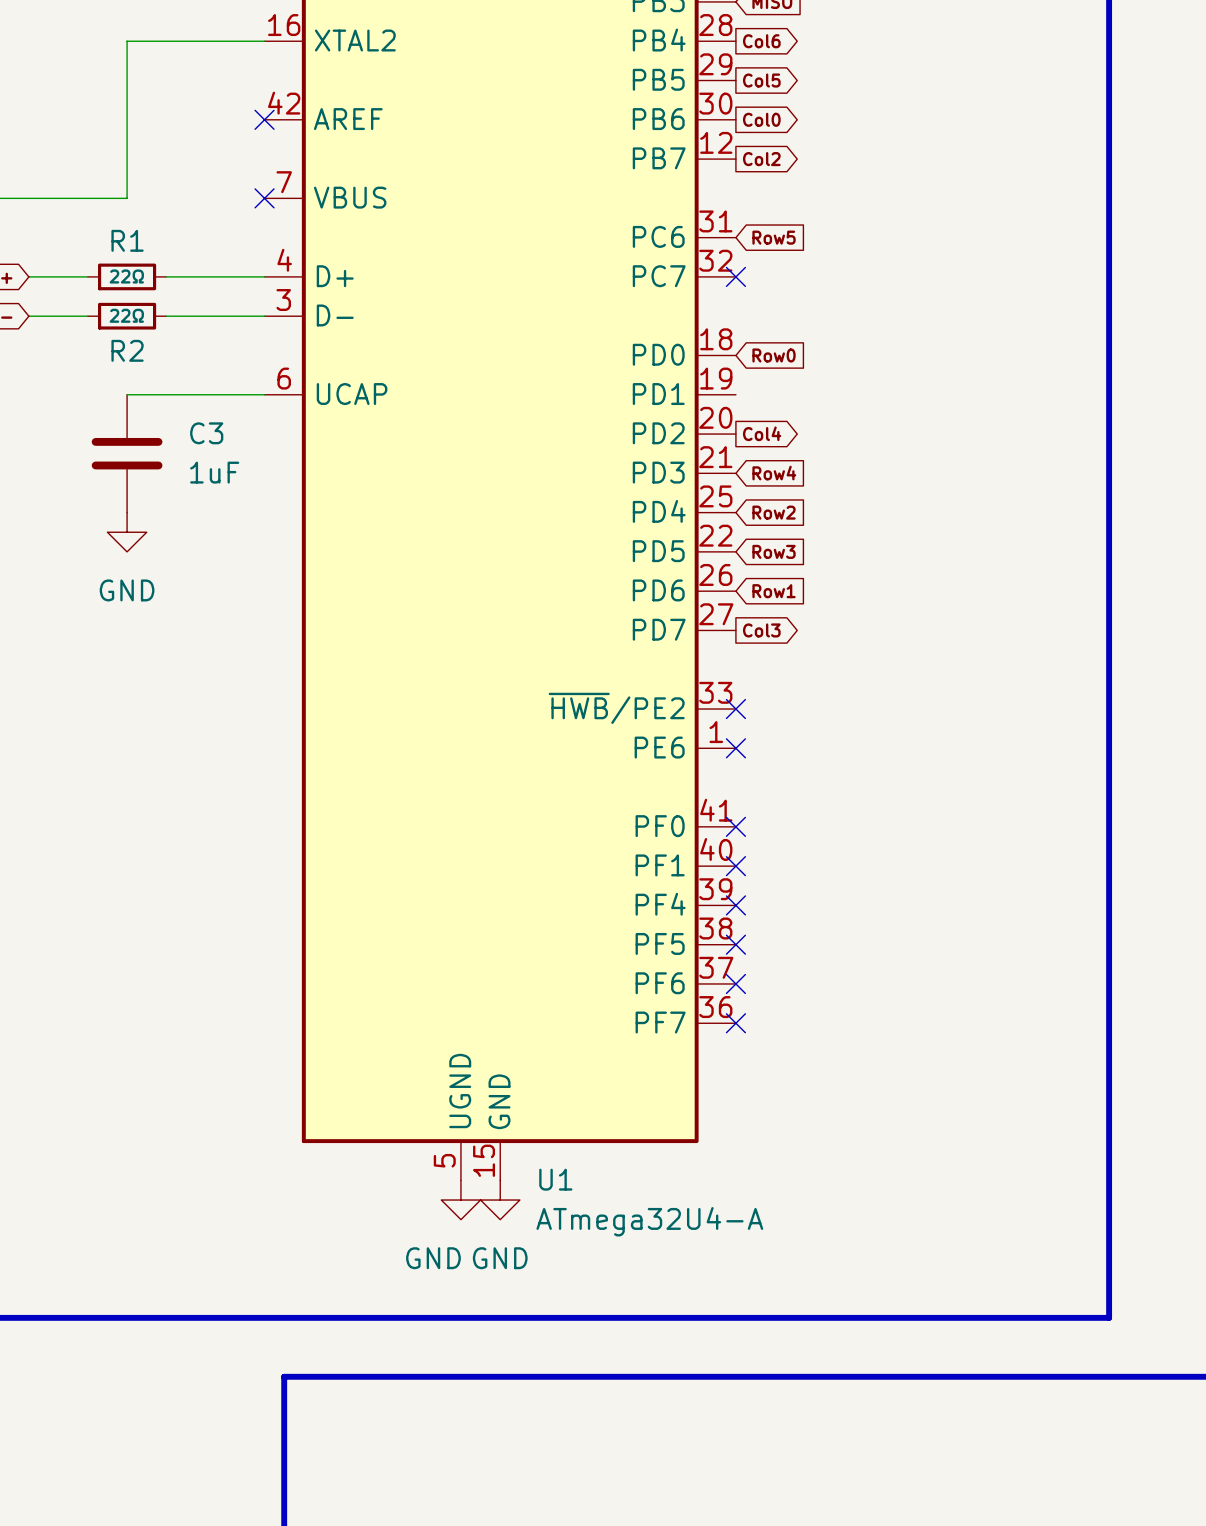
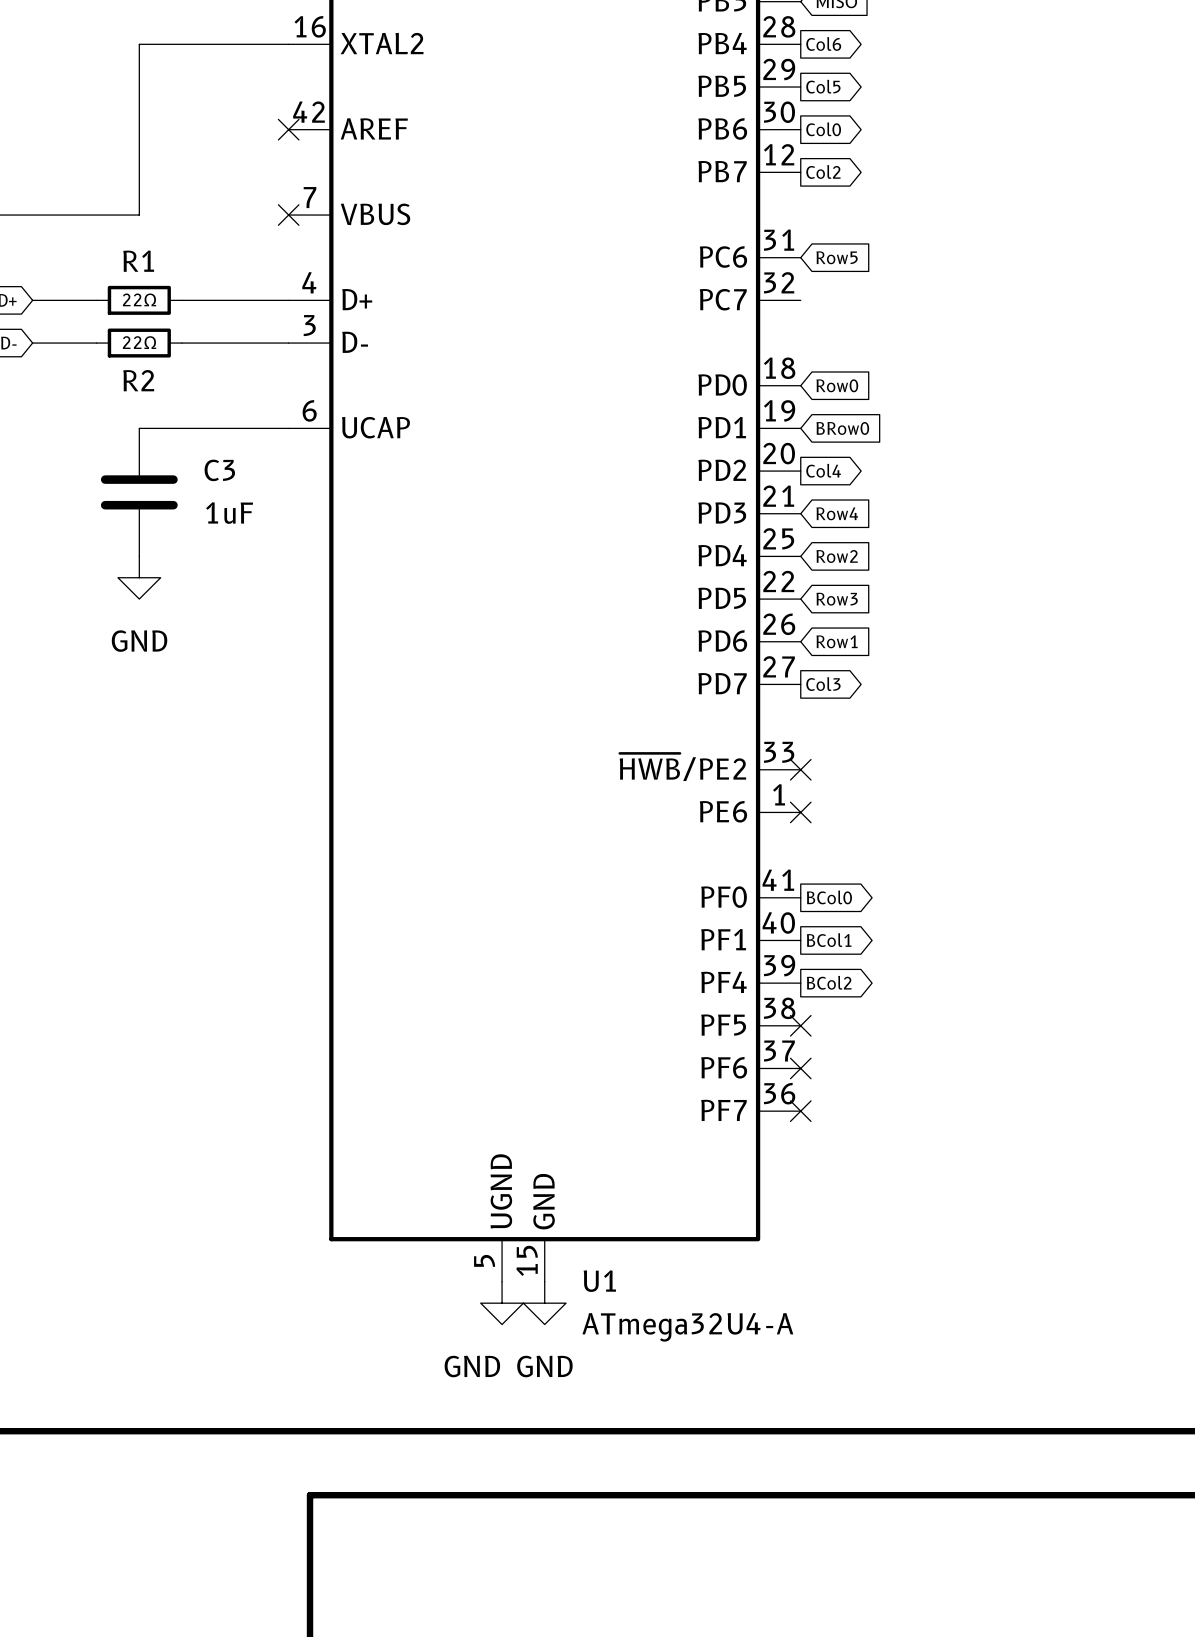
no-connect mark: (735, 276) -> none
global label: none -> BRow0 (842, 428)
no-connect mark: (735, 826) -> none
global label: none -> BCol0 (829, 897)
no-connect mark: (735, 866) -> none
global label: none -> BCol1 (829, 940)
no-connect mark: (735, 905) -> none
global label: none -> BCol2 (829, 982)

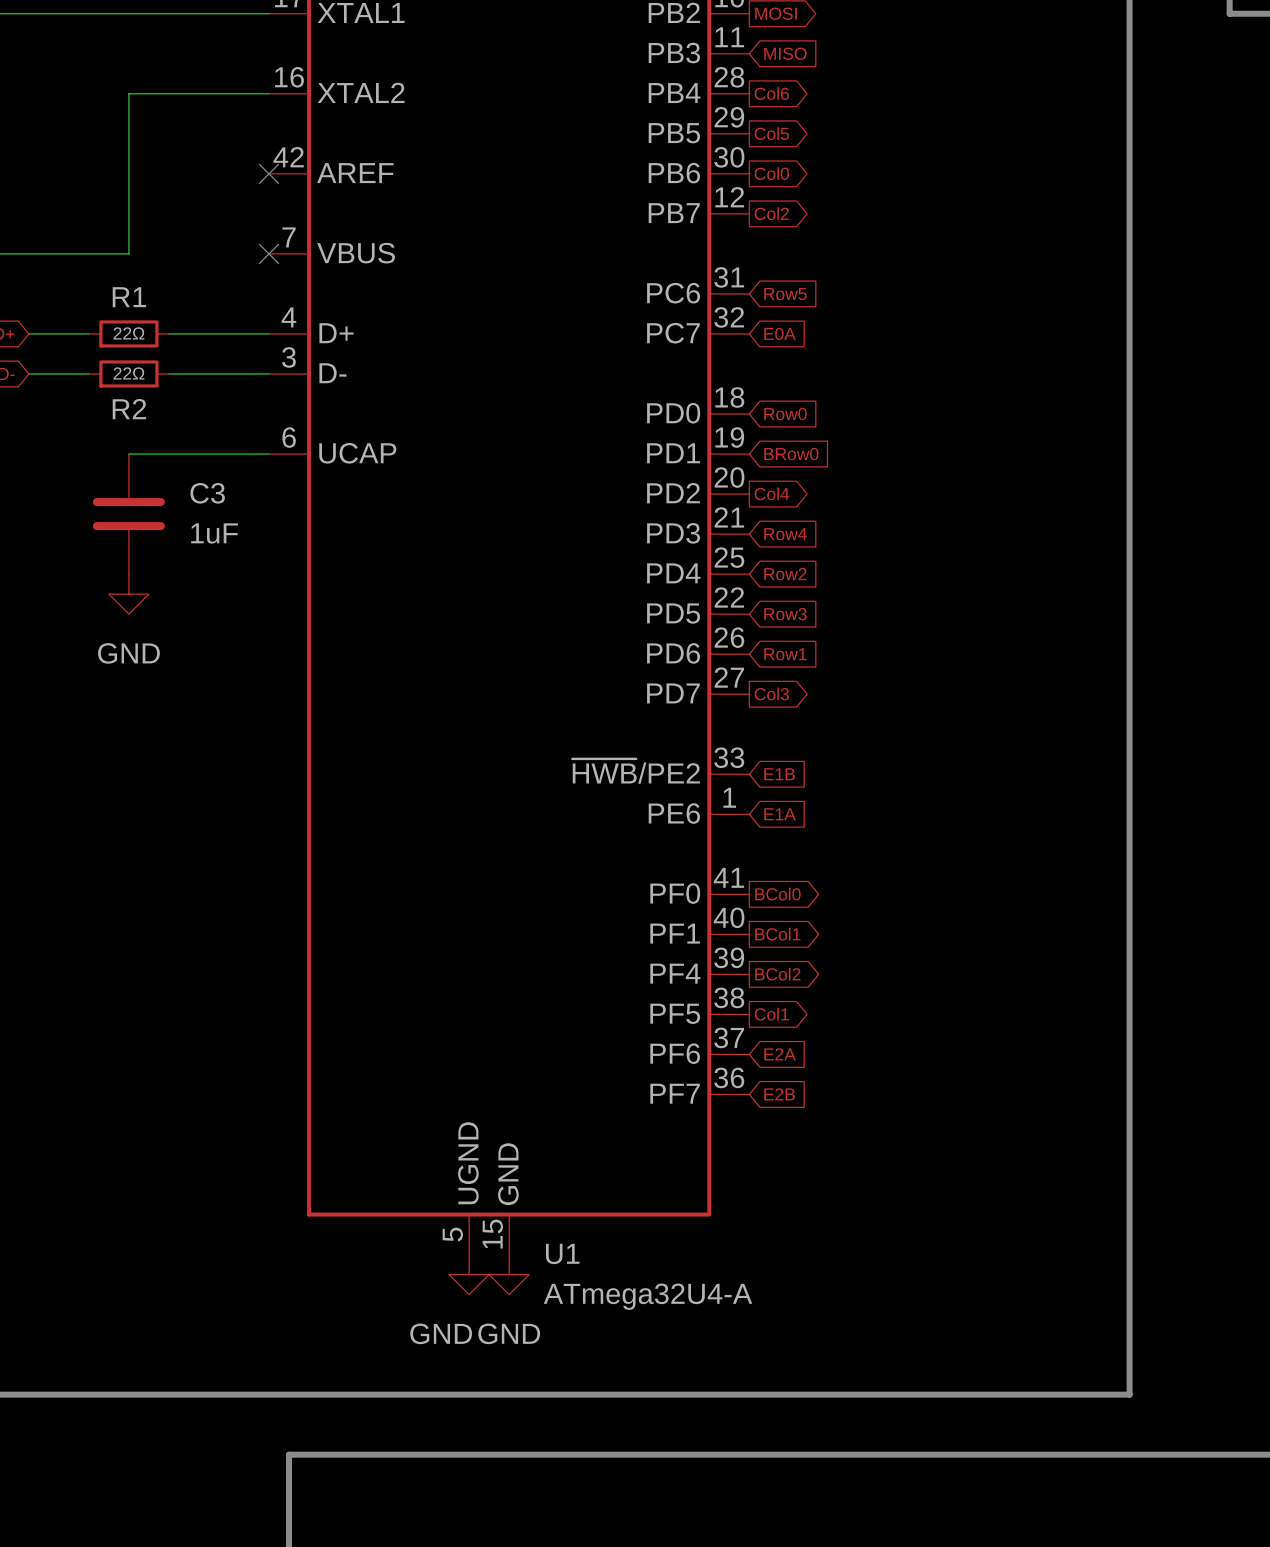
global label: none -> E0A (780, 333)
no-connect mark: (800, 769) -> none
global label: none -> E1B (779, 774)
no-connect mark: (800, 812) -> none
global label: none -> E1A (780, 814)
no-connect mark: (800, 1025) -> none
global label: none -> Col1 (771, 1014)
no-connect mark: (800, 1068) -> none
global label: none -> E2A (780, 1054)
no-connect mark: (800, 1111) -> none
global label: none -> E2B (779, 1094)

